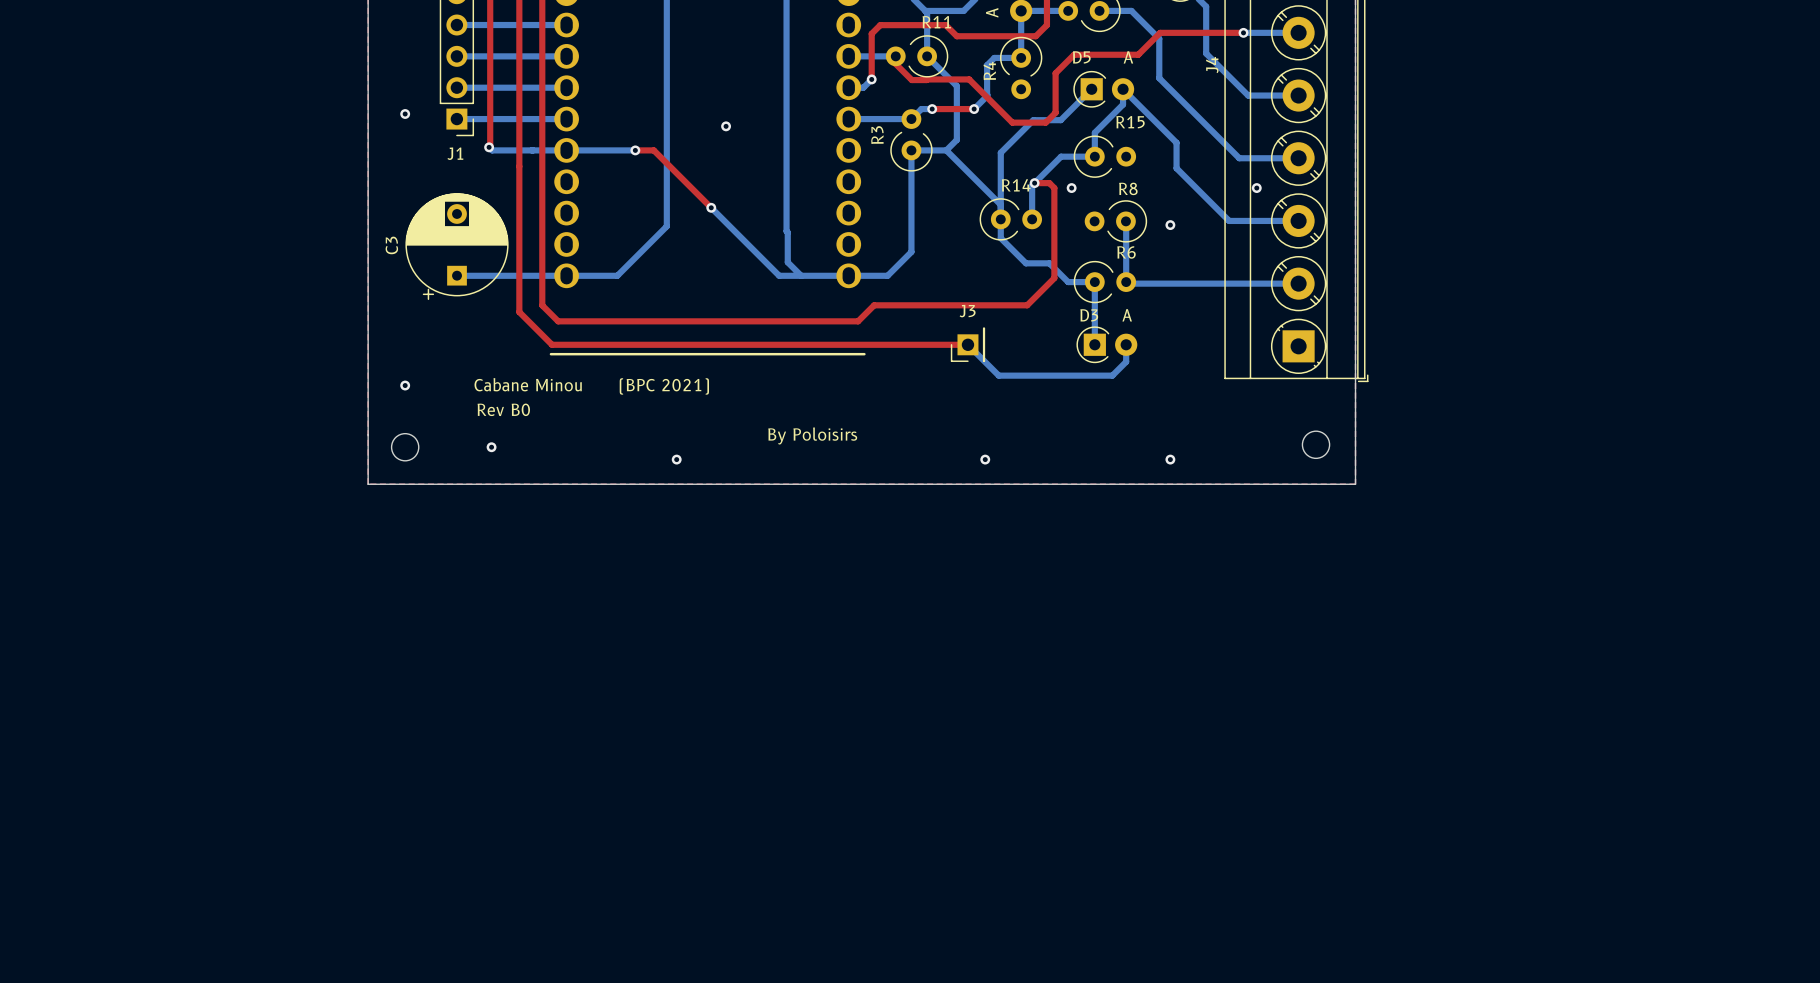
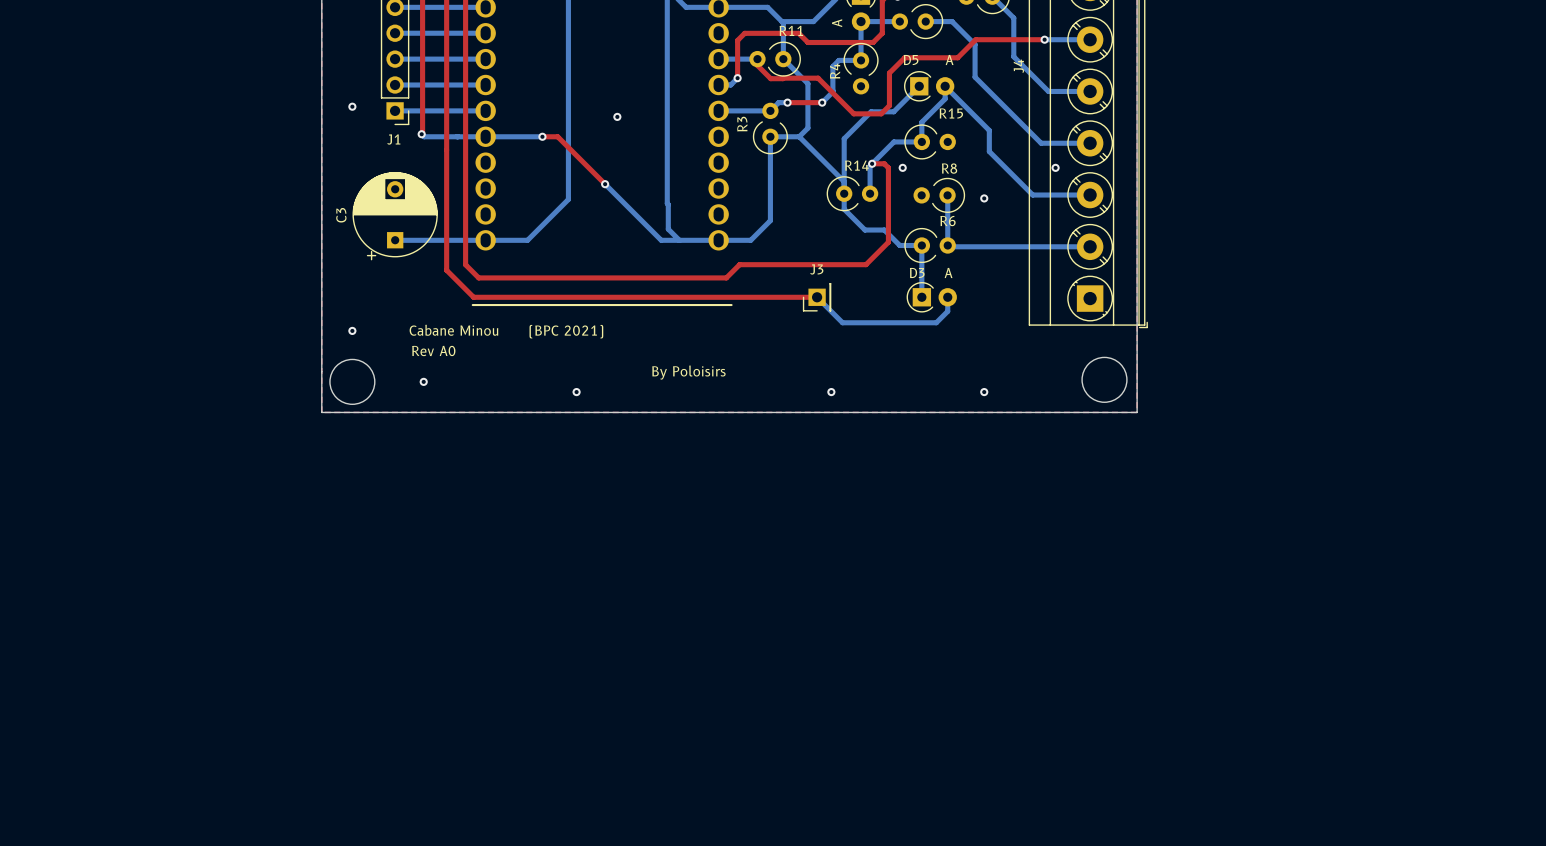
text: Rev B0 (503, 409) -> Rev A0 (433, 350)
round board edge size: [1302, 430, 1330, 459] -> [1081, 357, 1128, 403]
round board edge size: [391, 433, 420, 462] -> [329, 359, 376, 405]

